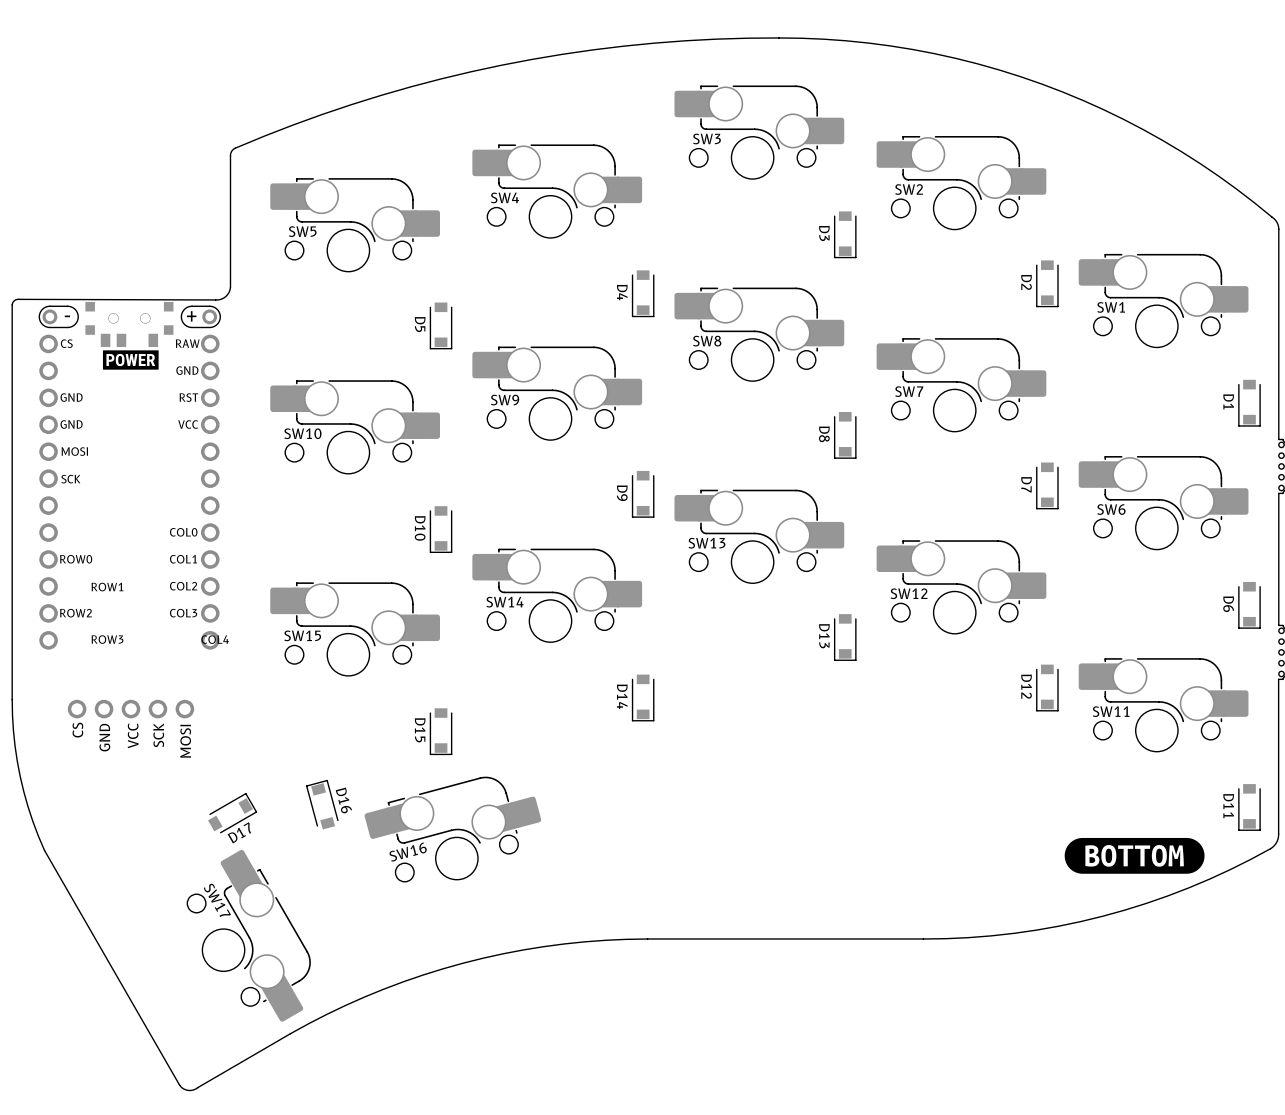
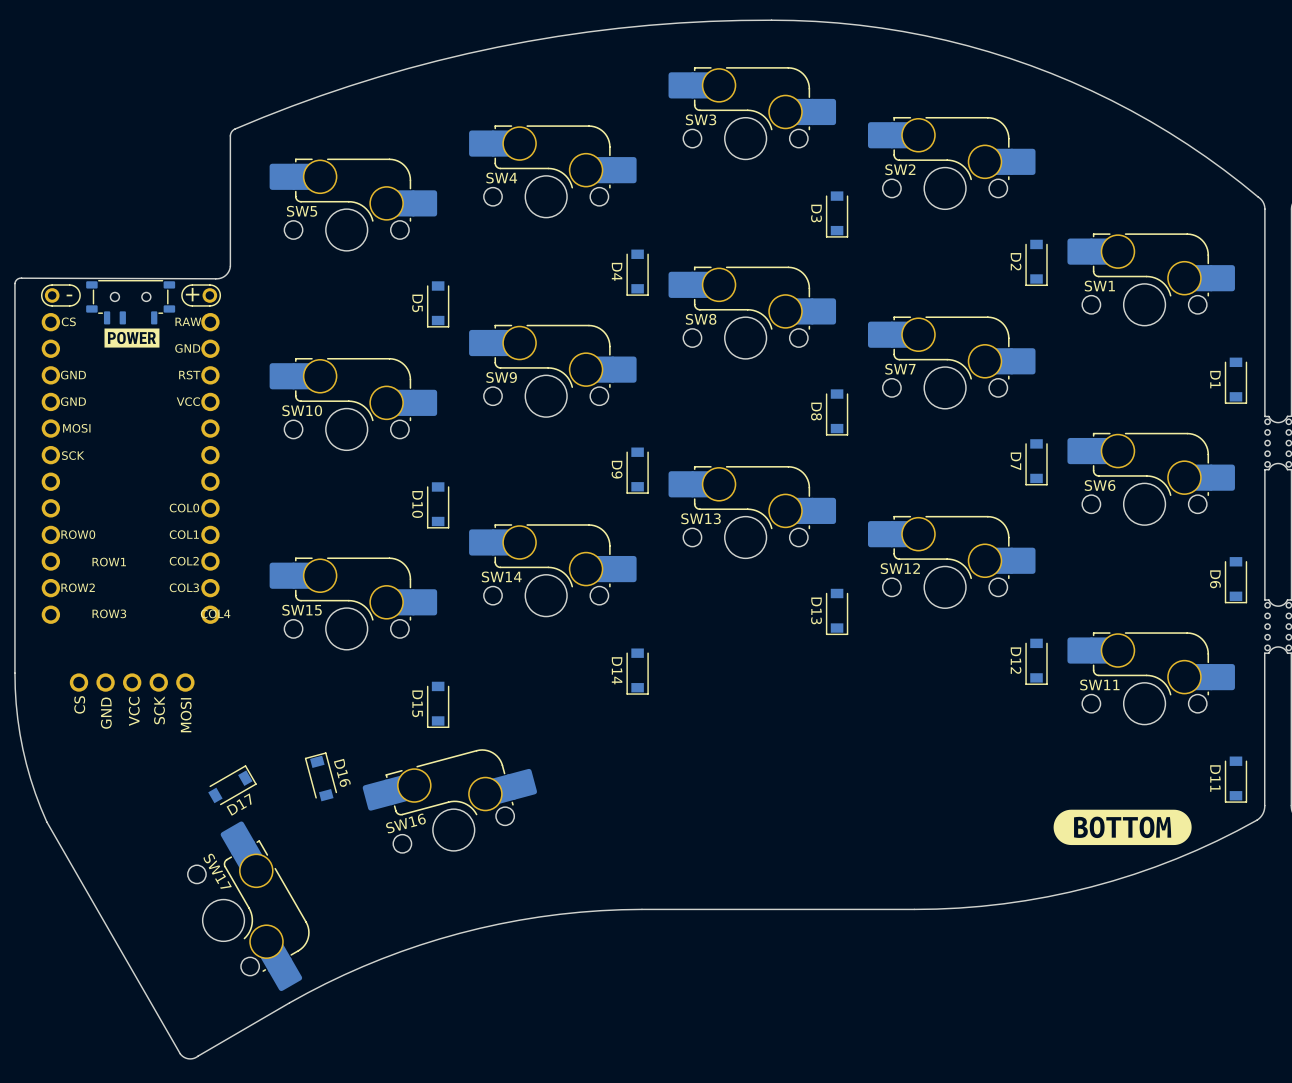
part footprint: [85, 301, 174, 348] -> [86, 280, 176, 325]

